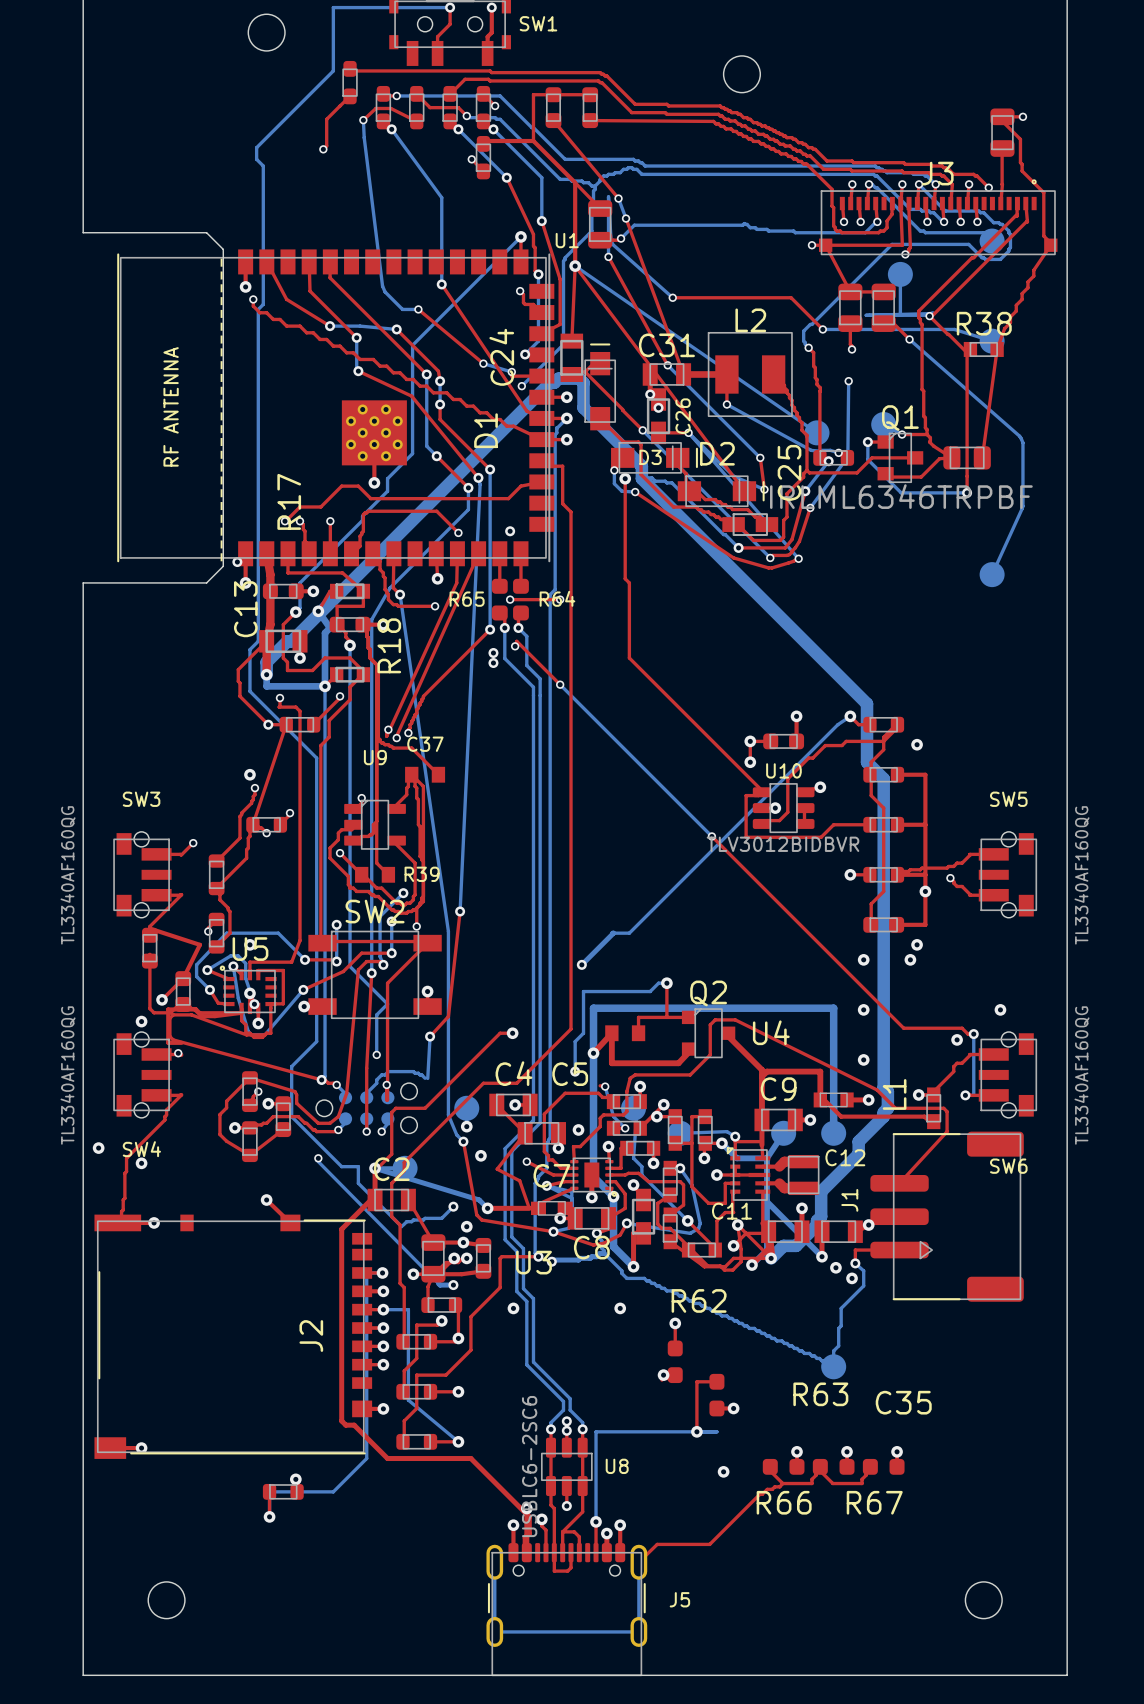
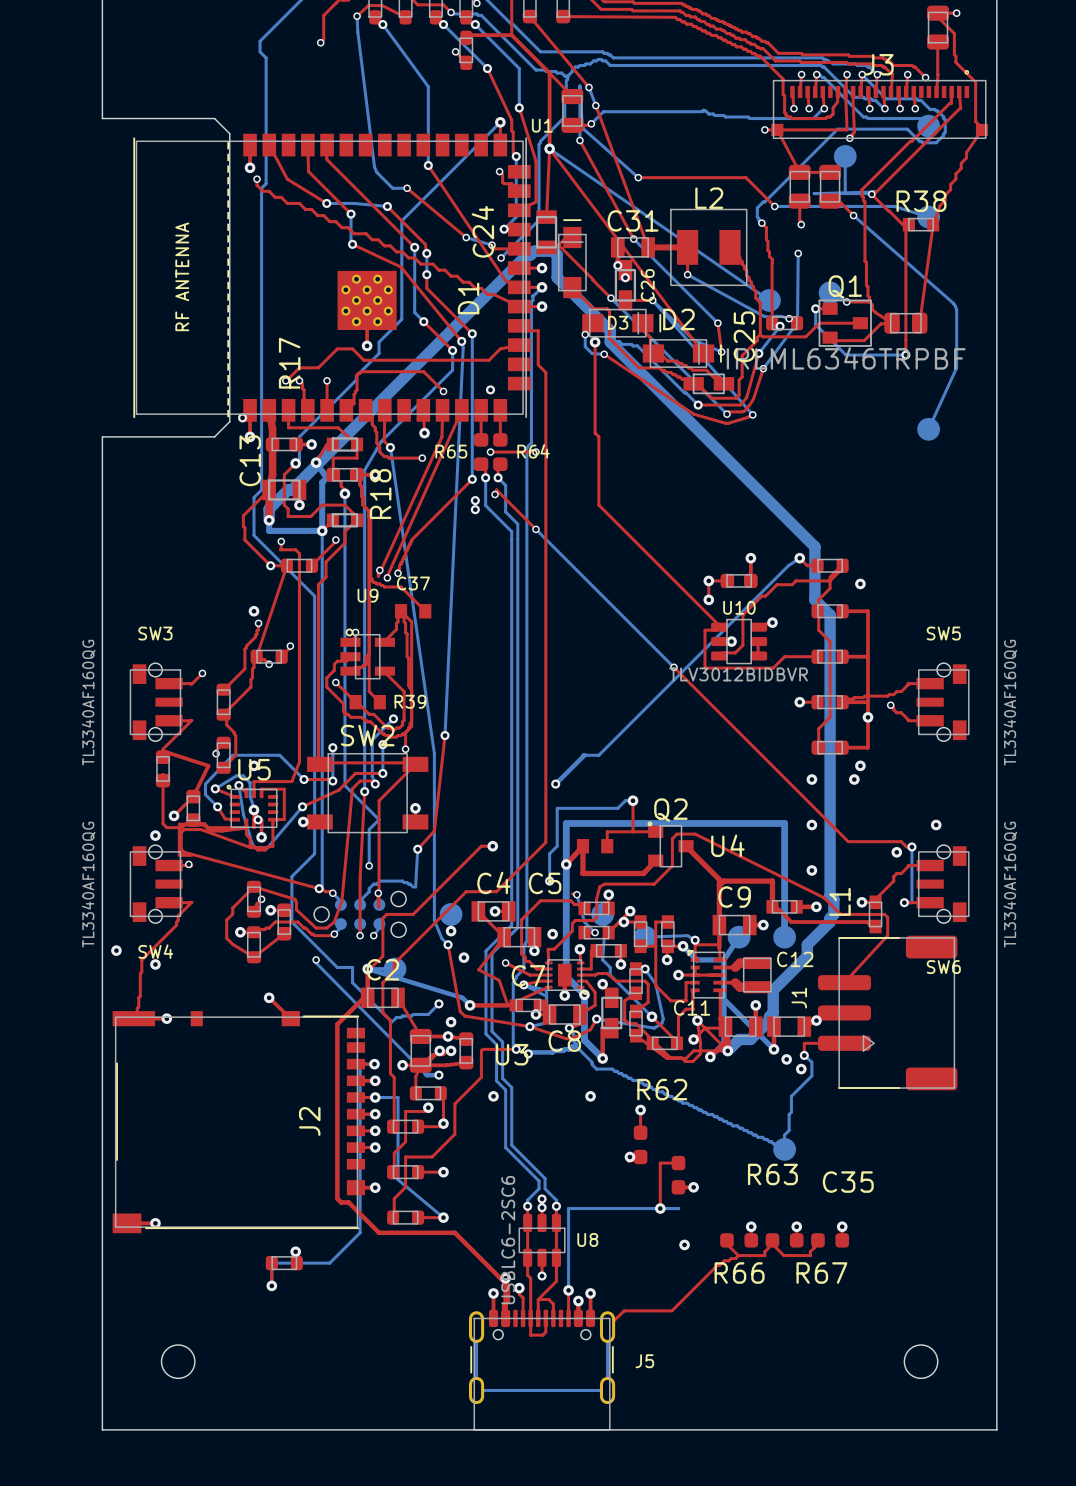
Q1 footprint: [877, 432, 924, 484] -> [818, 299, 872, 347]
U9 footprint: [344, 799, 406, 850] -> [340, 628, 395, 680]
Q2 footprint: [681, 1008, 736, 1059] -> [647, 821, 694, 868]

